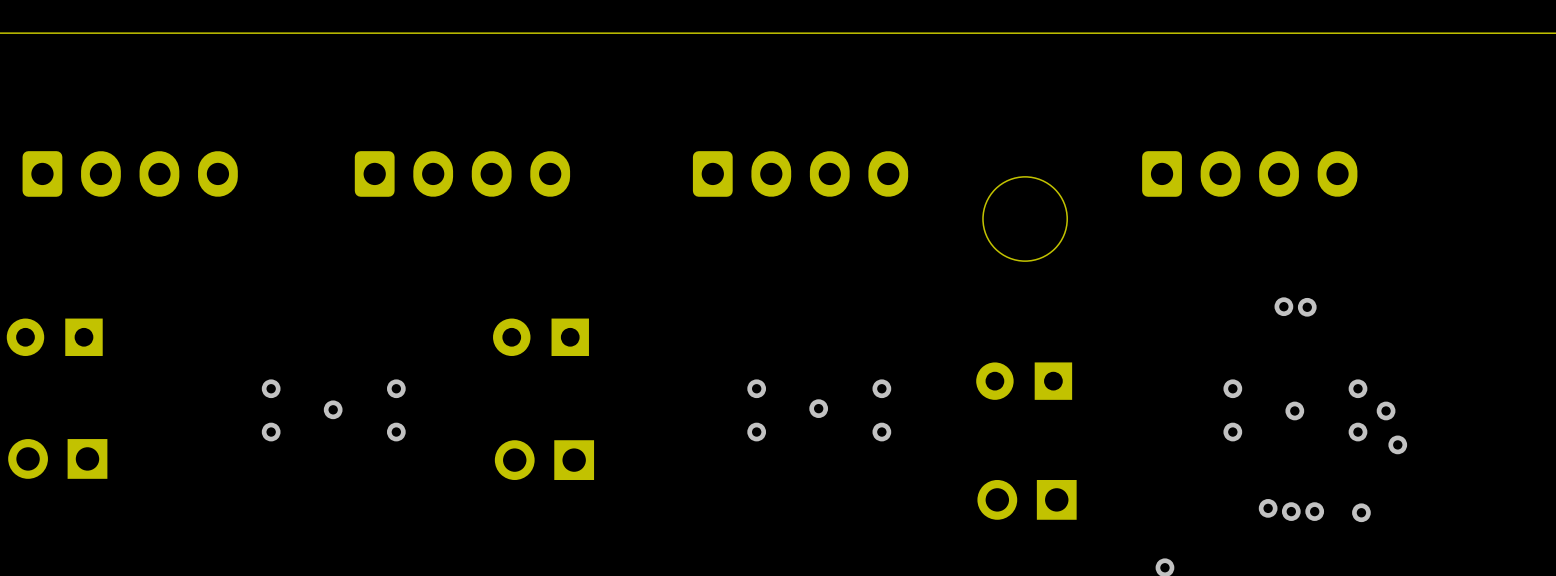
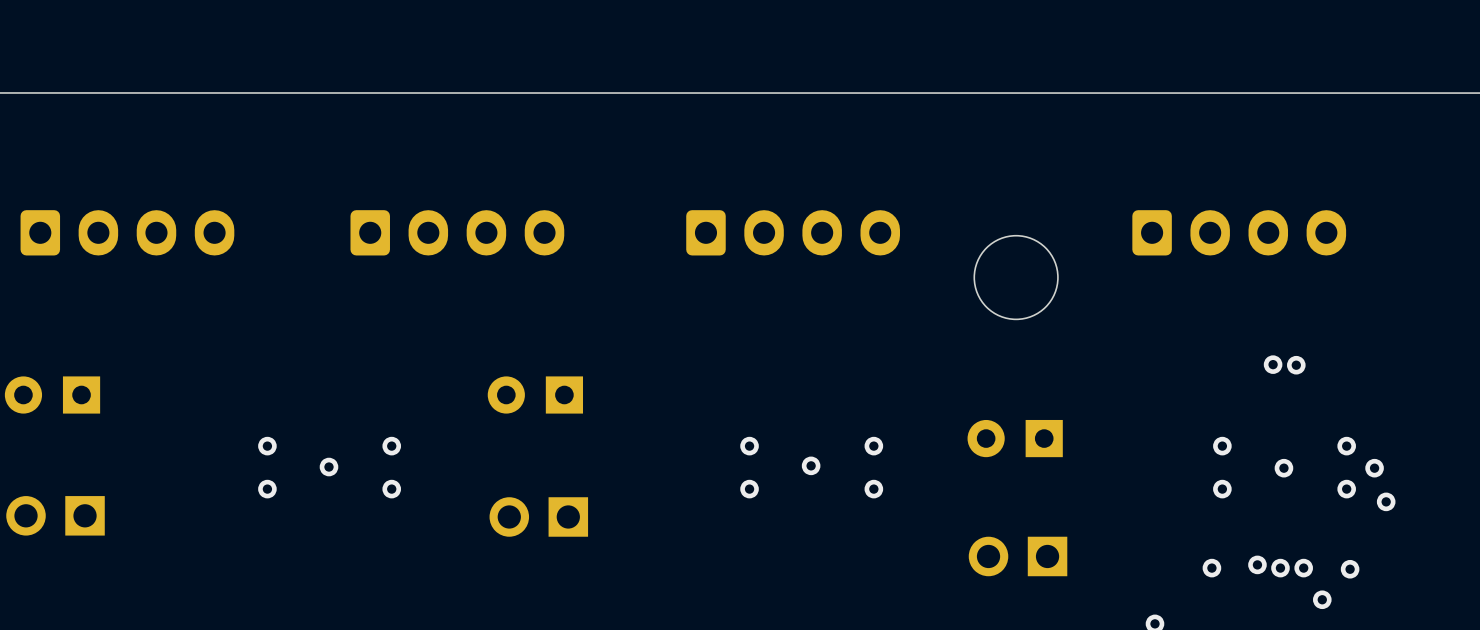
via: none -> (1211, 568)
via: none -> (1322, 599)

